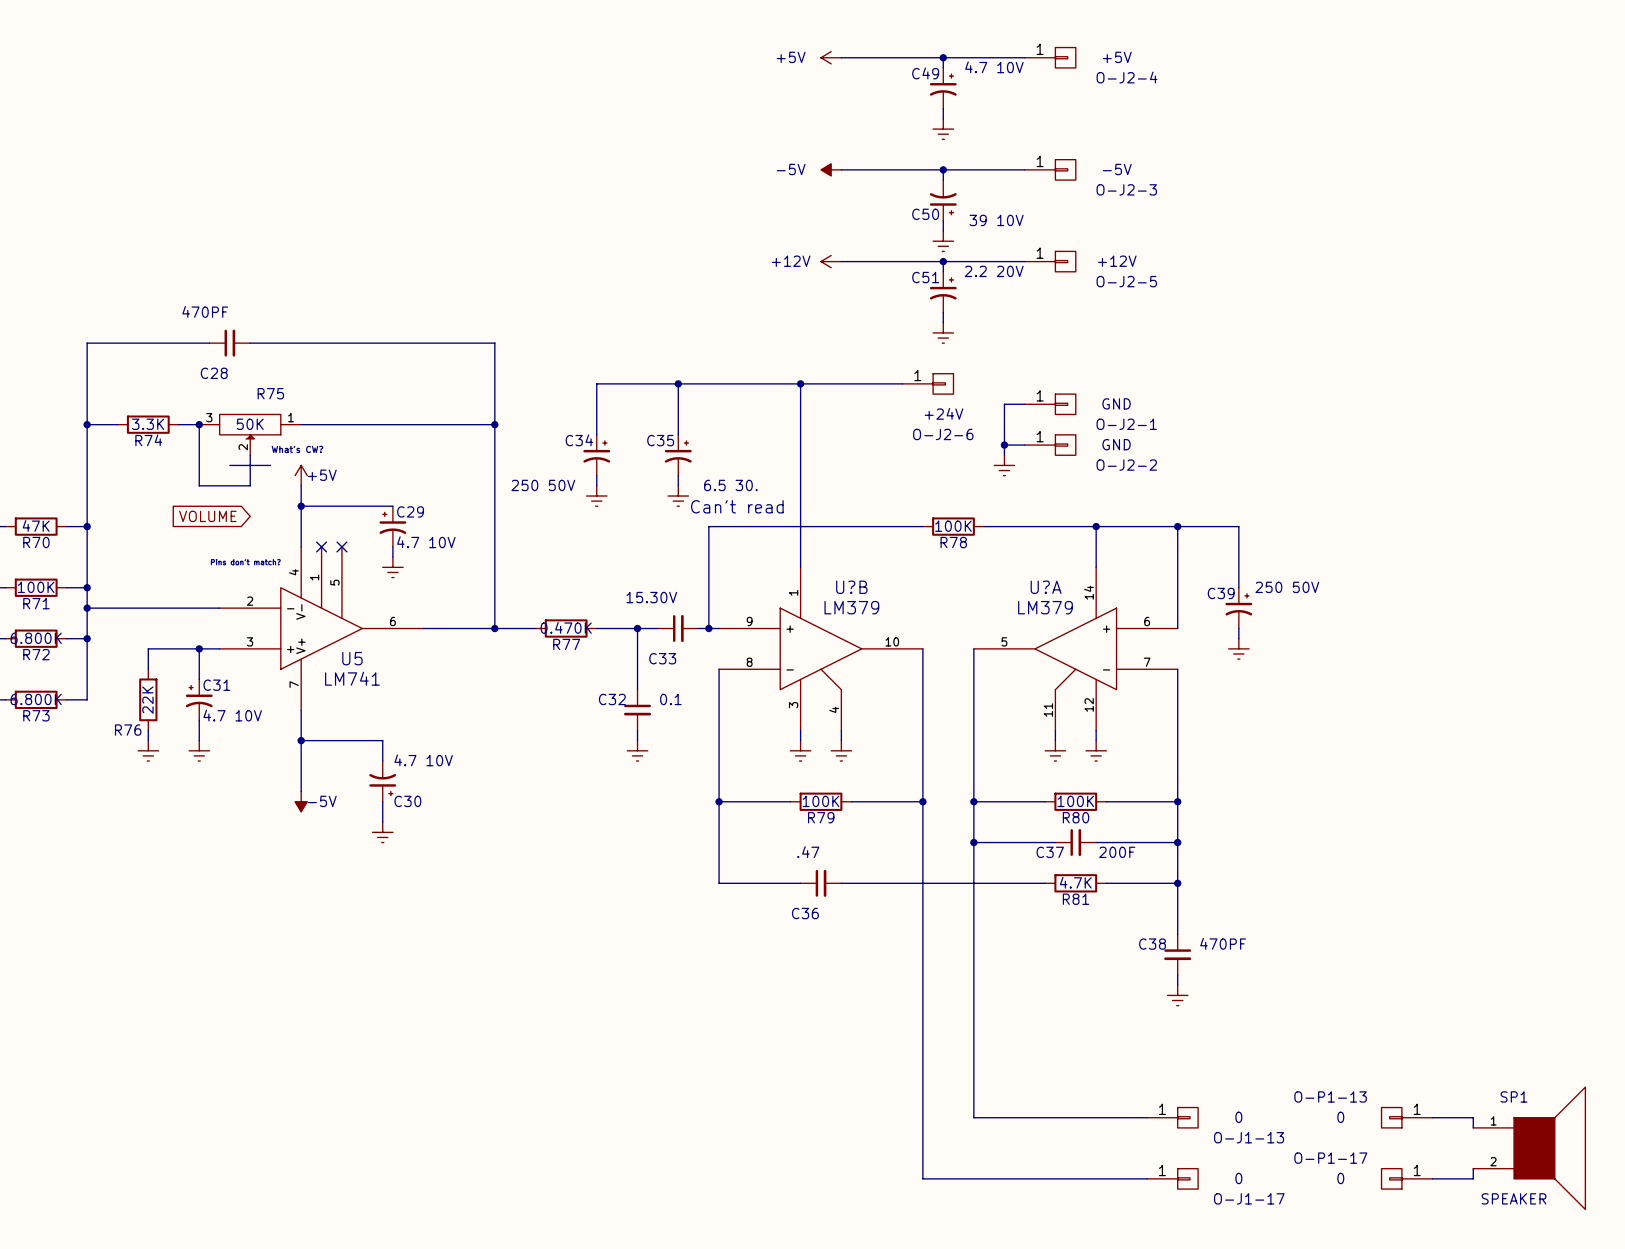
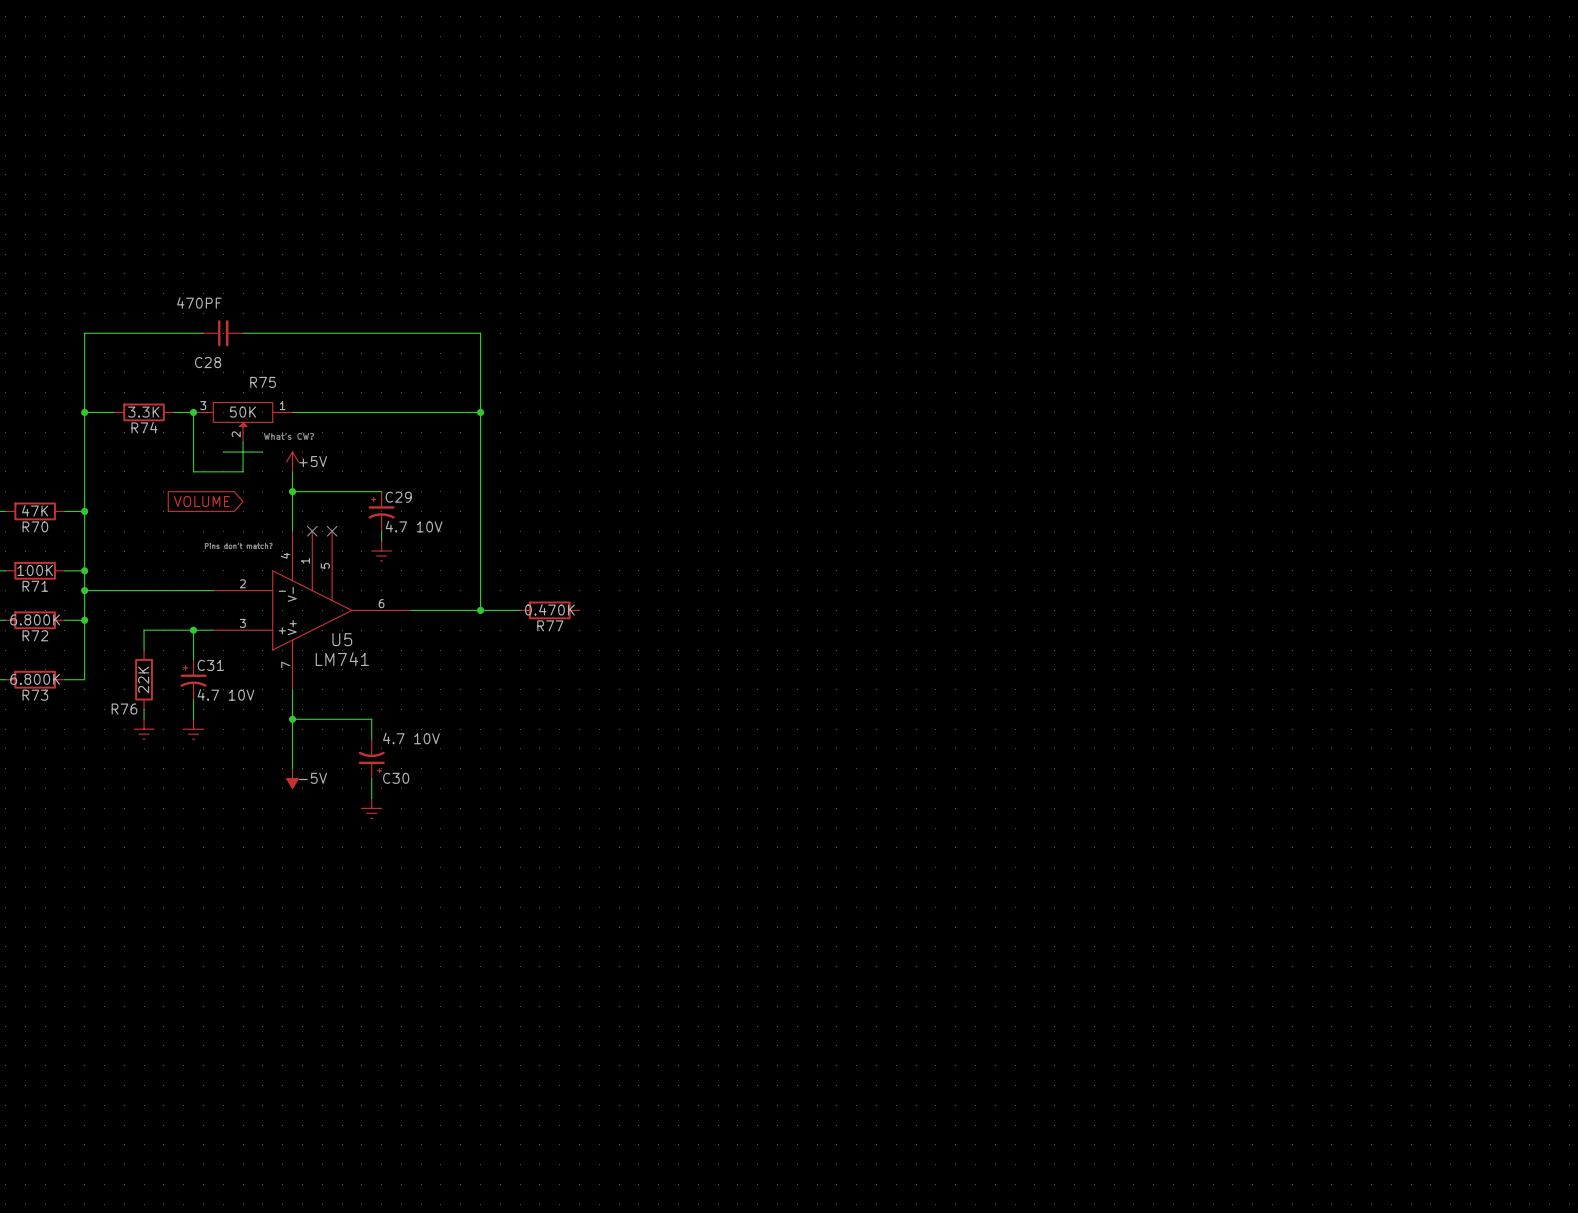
power symbol: +5V (831, 57) -> none
wire: (841, 57) (1024, 57) -> none
wire: (943, 57) (943, 67) -> none
junction: (943, 57) -> none
O-J2-4: +5V (1050, 57) -> none
C49: 4.7 10V (943, 88) -> none
wire: (943, 108) (943, 118) -> none
power symbol: (943, 129) -> none
power symbol: -5V (831, 169) -> none
wire: (841, 169) (1024, 169) -> none
wire: (943, 169) (943, 180) -> none
junction: (943, 169) -> none
O-J2-3: -5V (1050, 169) -> none
C50: 39 10V (943, 200) -> none
wire: (943, 220) (943, 231) -> none
power symbol: (943, 241) -> none
power symbol: +12V (831, 261) -> none
wire: (841, 261) (1024, 261) -> none
wire: (943, 261) (943, 271) -> none
junction: (943, 261) -> none
O-J2-5: +12V (1050, 261) -> none
C51: 2.2 20V (943, 292) -> none
wire: (943, 312) (943, 322) -> none
power symbol: (943, 332) -> none
wire: (678, 383) (678, 434) -> none
junction: (678, 383) -> none
wire: (800, 383) (800, 567) -> none
junction: (800, 383) -> none
wire: (902, 383) (596, 383) (596, 434) -> none
O-J2-6: +24V (927, 383) -> none
wire: (1024, 404) (1004, 404) (1004, 455) -> none
O-J2-1: GND (1050, 404) -> none
wire: (1004, 445) (1024, 445) -> none
junction: (1004, 445) -> none
O-J2-2: GND (1050, 445) -> none
C34: 250 50V (596, 455) -> none
C35: 6.5 30. (678, 455) -> none
power symbol: (1004, 465) -> none
wire: (596, 475) (596, 485) -> none
wire: (678, 475) (678, 485) -> none
power symbol: (596, 496) -> none
power symbol: (678, 496) -> none
text: Can't read (737, 506) -> none
wire: (922, 526) (708, 526) (708, 628) -> none
R78: 100K (953, 526) -> none
wire: (984, 526) (1238, 526) (1238, 587) -> none
wire: (1096, 526) (1096, 567) -> none
junction: (1096, 526) -> none
wire: (1177, 526) (1177, 628) -> none
junction: (1177, 526) -> none
C39: 250 50V (1238, 608) -> none
wire: (596, 628) (657, 628) -> none
wire: (637, 628) (637, 689) -> none
junction: (637, 628) -> none
C33: 15.30V (678, 628) -> none
wire: (698, 628) (719, 628) -> none
junction: (708, 628) -> none
wire: (1238, 628) (1238, 638) -> none
U?B: LM379 (820, 648) -> none
wire: (922, 648) (922, 1178) (1147, 1178) -> none
wire: (973, 648) (973, 1117) (1147, 1117) -> none
U?A: LM379 (1075, 648) -> none
power symbol: (1238, 648) -> none
wire: (719, 669) (719, 883) (800, 883) -> none
wire: (1177, 669) (1177, 934) -> none
C32: 0.1 (637, 710) -> none
wire: (637, 730) (637, 740) -> none
wire: (800, 730) (800, 740) -> none
wire: (841, 730) (841, 740) -> none
wire: (1055, 730) (1055, 740) -> none
wire: (1096, 730) (1096, 740) -> none
power symbol: (637, 750) -> none
power symbol: (800, 750) -> none
power symbol: (841, 750) -> none
power symbol: (1055, 750) -> none
power symbol: (1096, 750) -> none
wire: (719, 801) (790, 801) -> none
junction: (719, 801) -> none
R79: 100K (820, 801) -> none
wire: (851, 801) (922, 801) -> none
junction: (922, 801) -> none
wire: (973, 801) (1045, 801) -> none
junction: (973, 801) -> none
R80: 100K (1075, 801) -> none
wire: (1106, 801) (1177, 801) -> none
junction: (1177, 801) -> none
wire: (973, 842) (1055, 842) -> none
junction: (973, 842) -> none
C37: 200F (1075, 842) -> none
wire: (1096, 842) (1177, 842) -> none
junction: (1177, 842) -> none
C36: .47 (820, 883) -> none
wire: (841, 883) (1045, 883) -> none
R81: 4.7K (1075, 883) -> none
wire: (1106, 883) (1177, 883) -> none
junction: (1177, 883) -> none
C38: 470PF (1177, 954) -> none
wire: (1177, 975) (1177, 985) -> none
power symbol: (1177, 995) -> none
O-J1-13: 0 (1172, 1117) -> none
O-P1-13: 0 (1407, 1117) -> none
wire: (1432, 1117) (1473, 1117) (1473, 1127) -> none
SP1: SPEAKER (1529, 1148) -> none
wire: (1473, 1168) (1473, 1178) (1432, 1178) -> none
O-J1-17: 0 (1172, 1178) -> none
O-P1-17: 0 (1407, 1178) -> none

